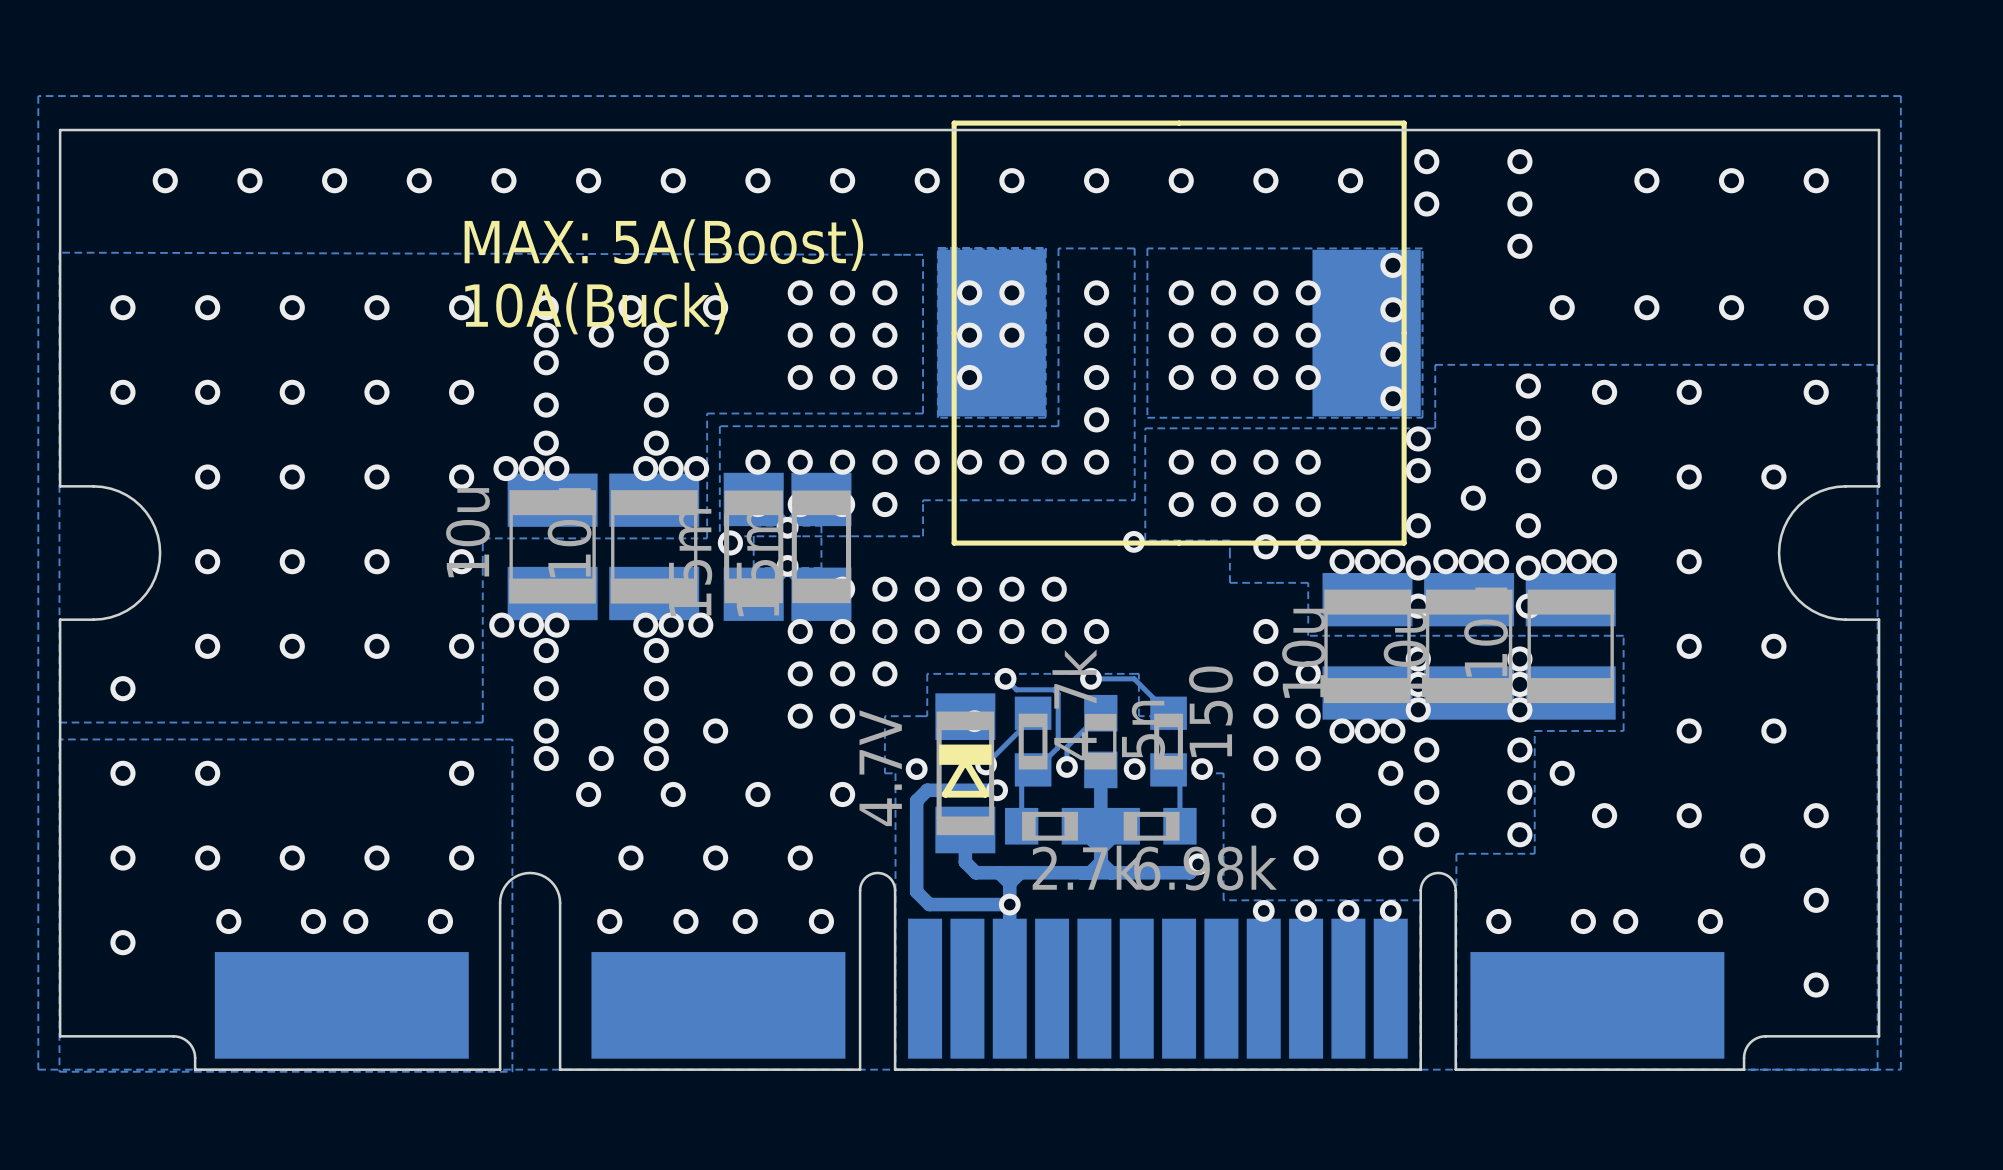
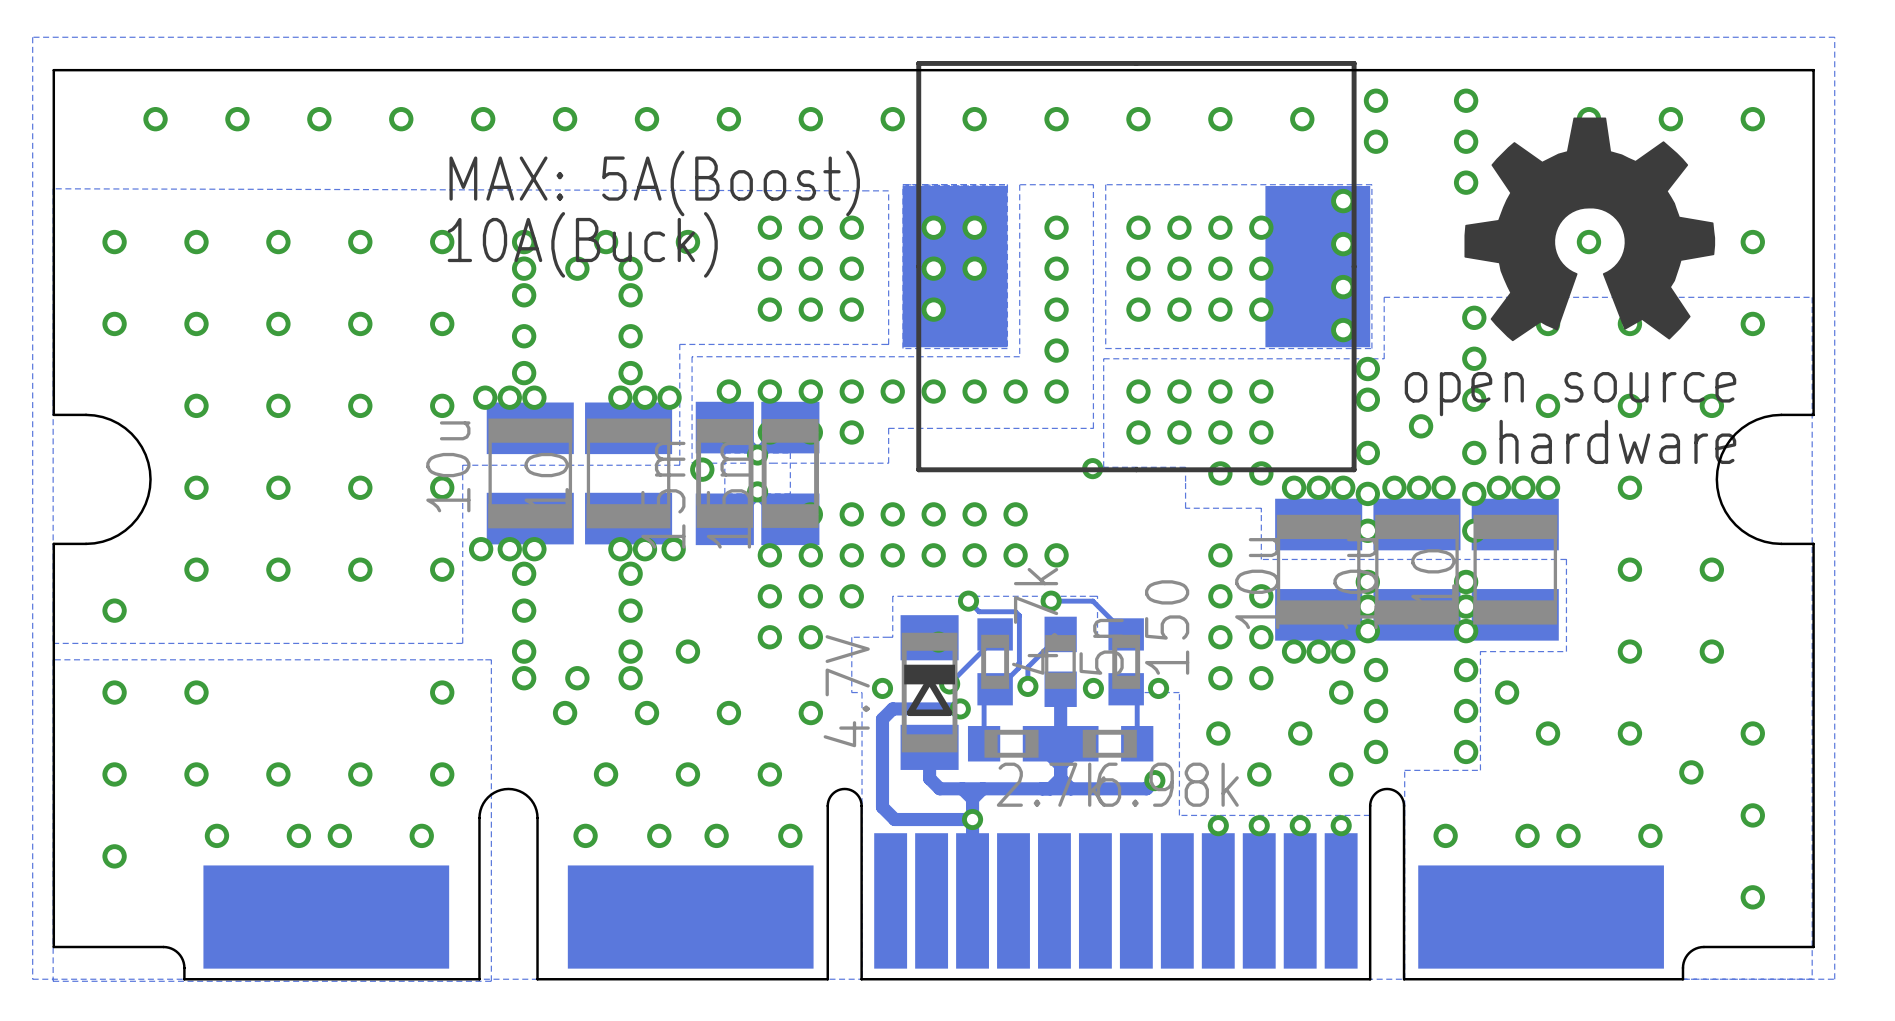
drawing: none -> [1464, 117, 1716, 342]

